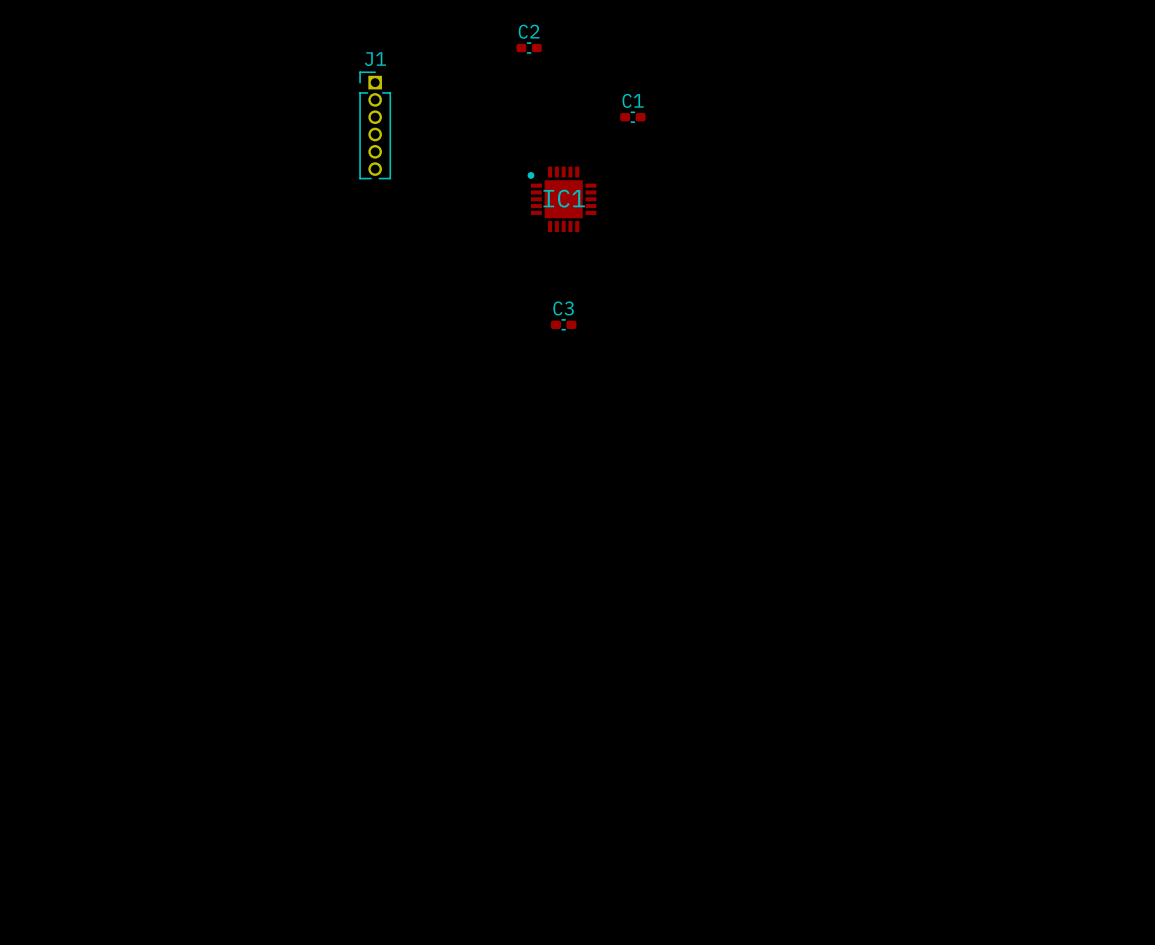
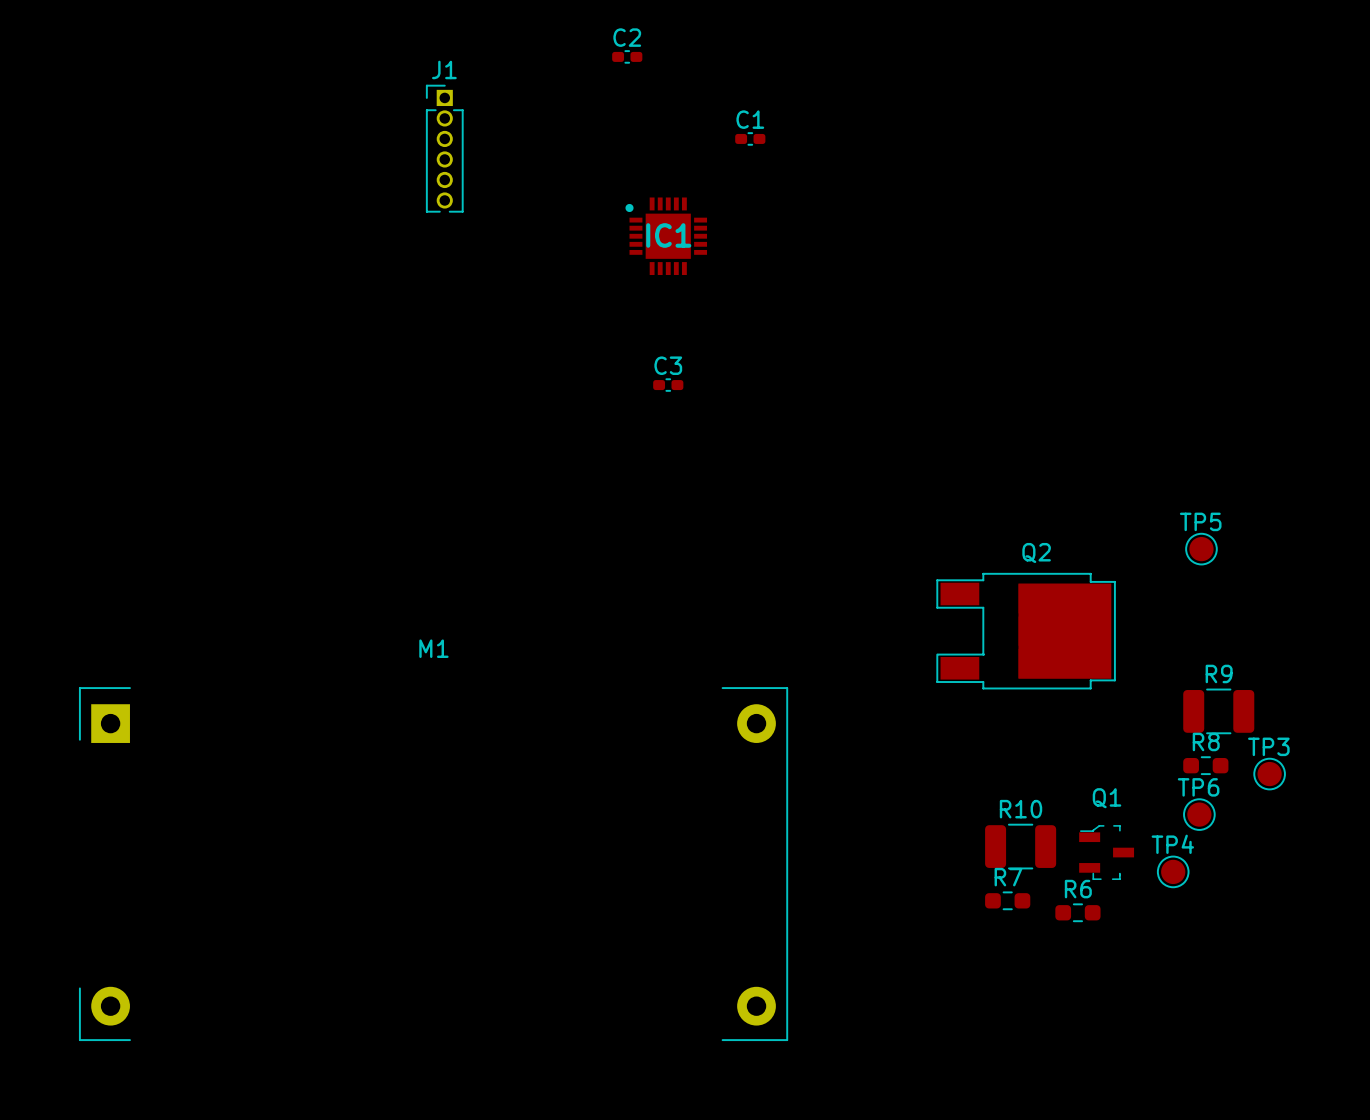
TP5: none -> (1201, 549)
Q2: none -> (1026, 631)
R9: none -> (1218, 711)
R8: none -> (1205, 765)
TP3: none -> (1269, 774)
TP6: none -> (1199, 814)
R10: none -> (1020, 846)
Q1: none -> (1106, 852)
M1: none -> (433, 864)
TP4: none -> (1173, 871)
R7: none -> (1007, 900)
R6: none -> (1077, 912)

